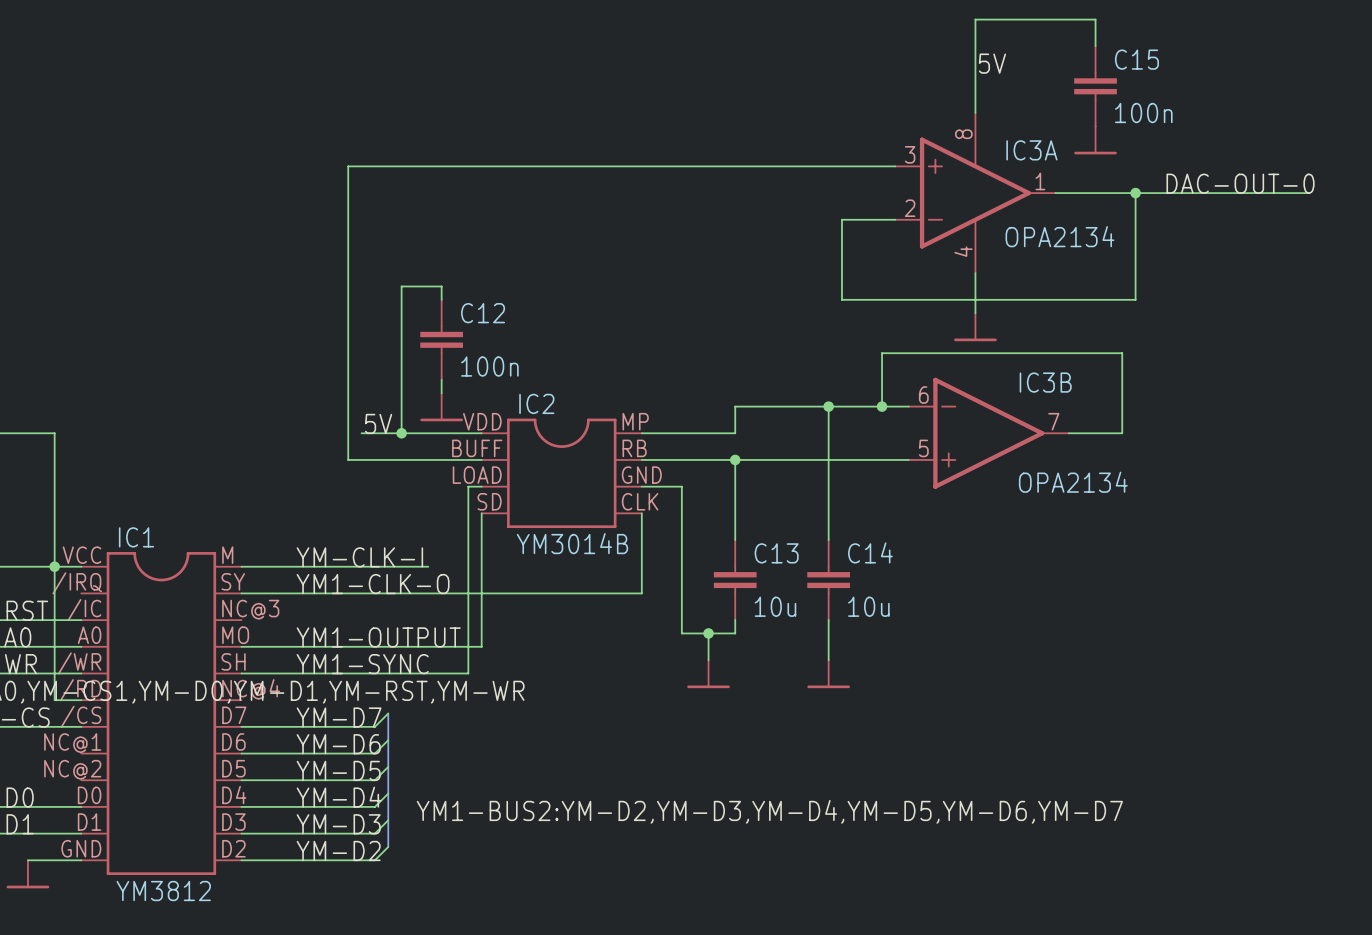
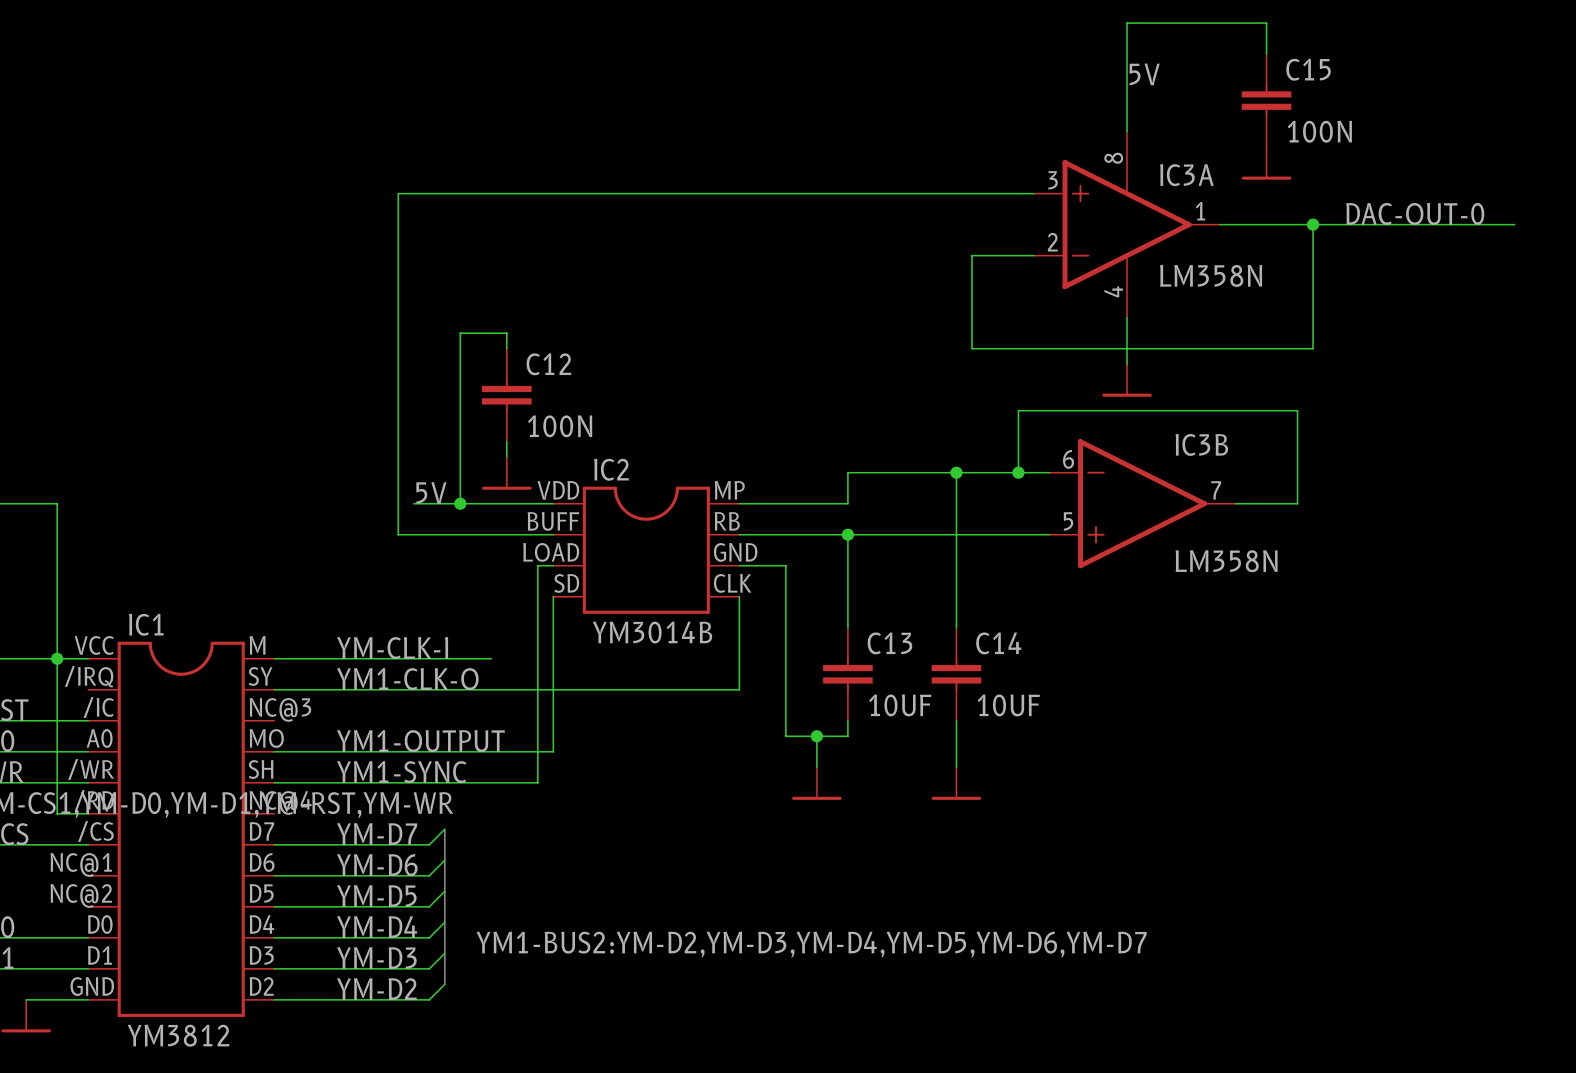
C15 value: 100n (1143, 113) -> 100N (1319, 131)
IC3A value: OPA2134 (1059, 236) -> LM358N (1211, 275)
C12 value: 100n (489, 366) -> 100N (560, 426)
IC3B value: OPA2134 (1073, 482) -> LM358N (1226, 561)
C13 value: 10u (775, 606) -> 10UF (900, 705)
C14 value: 10u (868, 606) -> 10UF (1008, 705)

